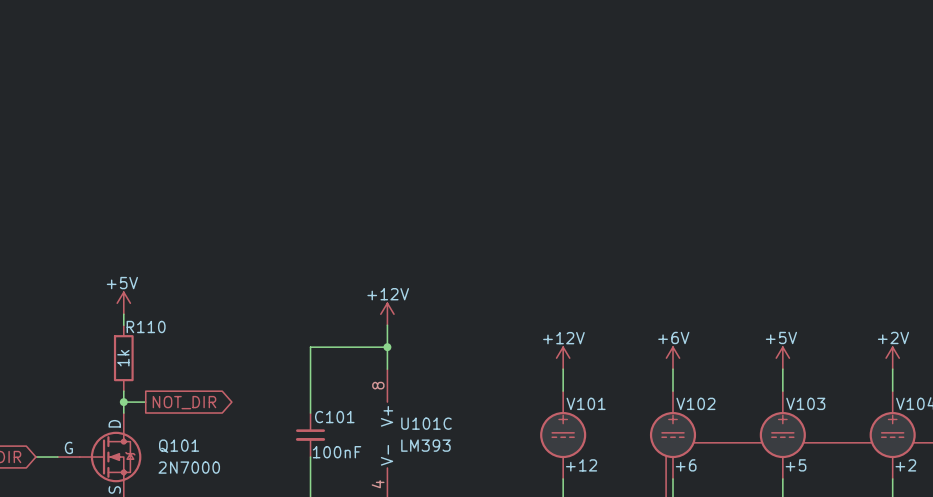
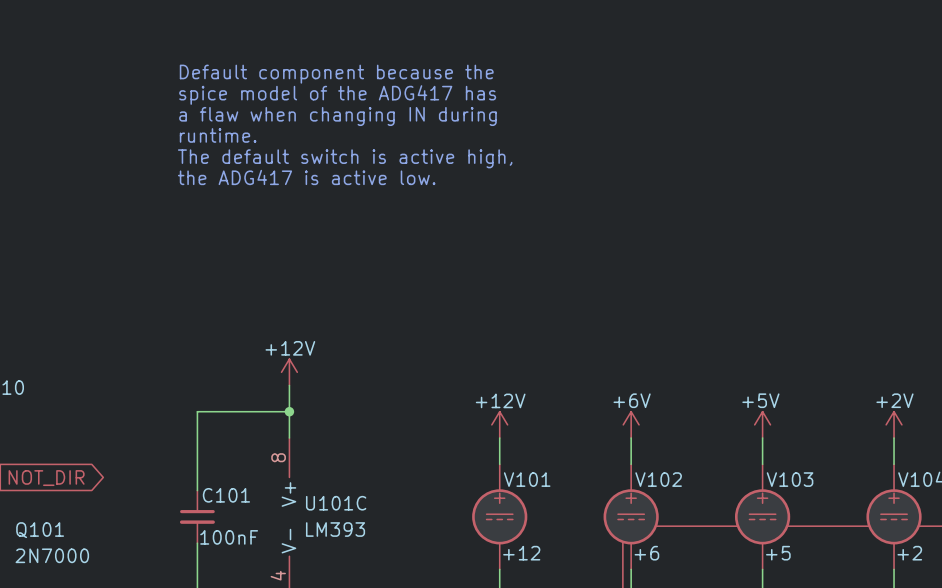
text: none -> Default component because the (336, 74)
text: none -> spice model of the ADG417 has (337, 95)
text: none -> a flaw when changing IN during (337, 116)
text: none -> runtime. (218, 135)
text: none -> The default switch is active high, (345, 158)
text: none -> the ADG417 is active low. (306, 177)

